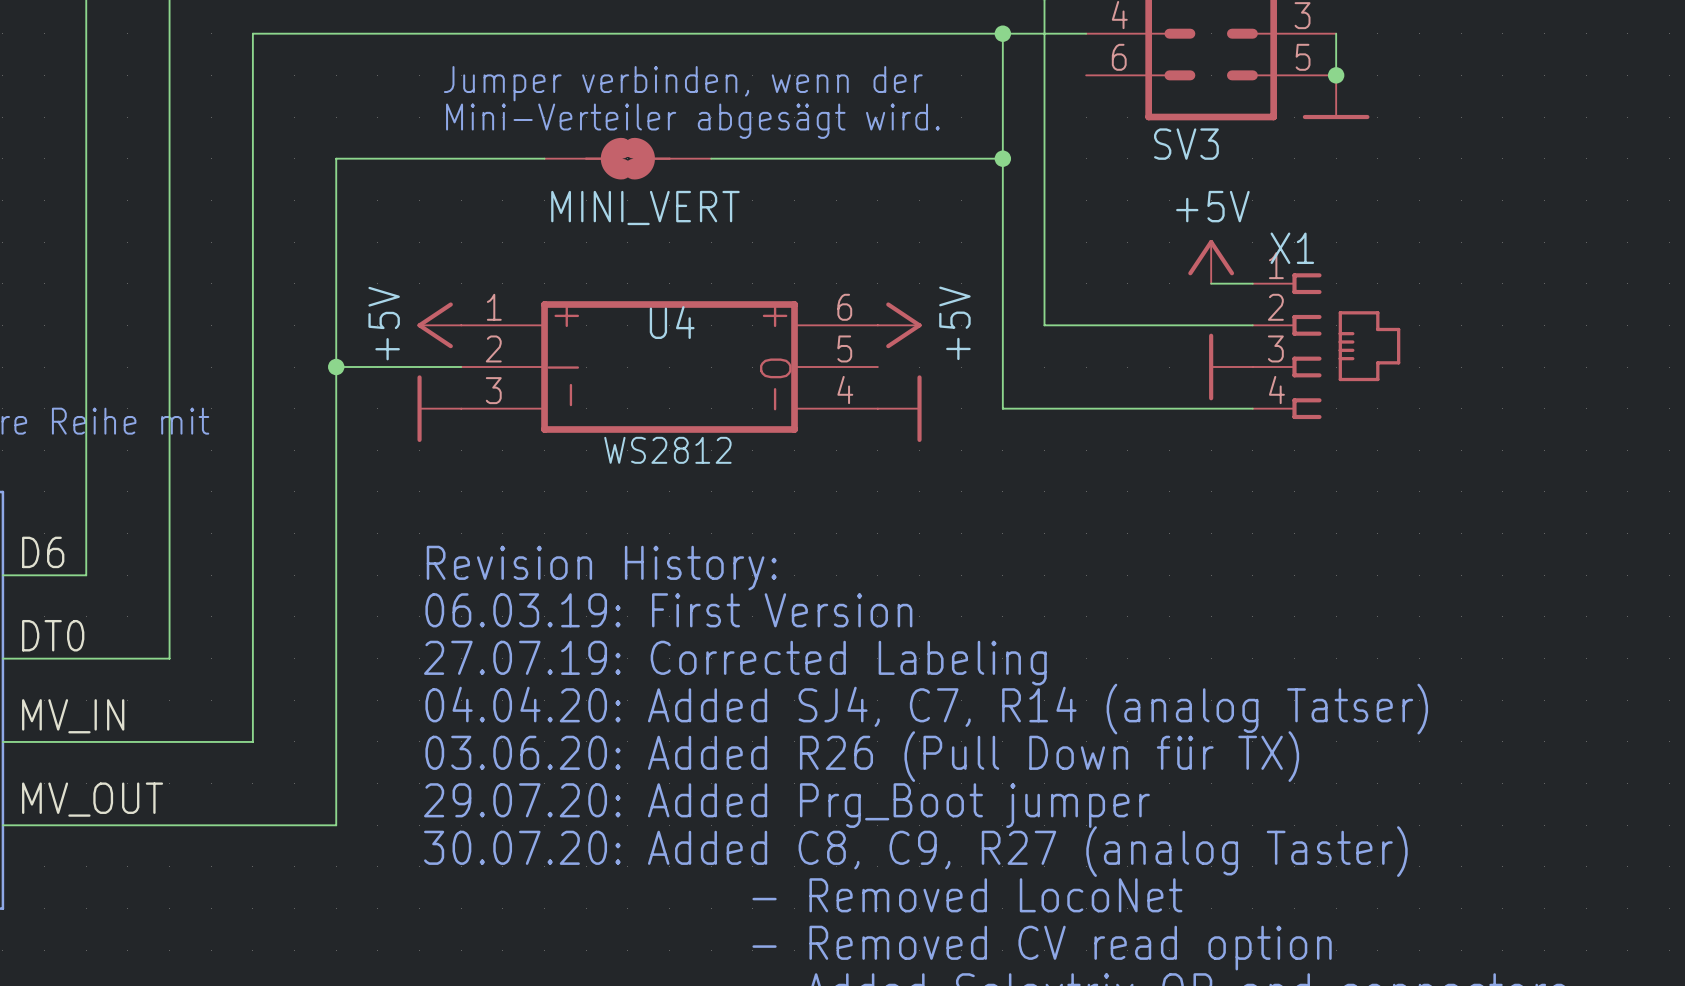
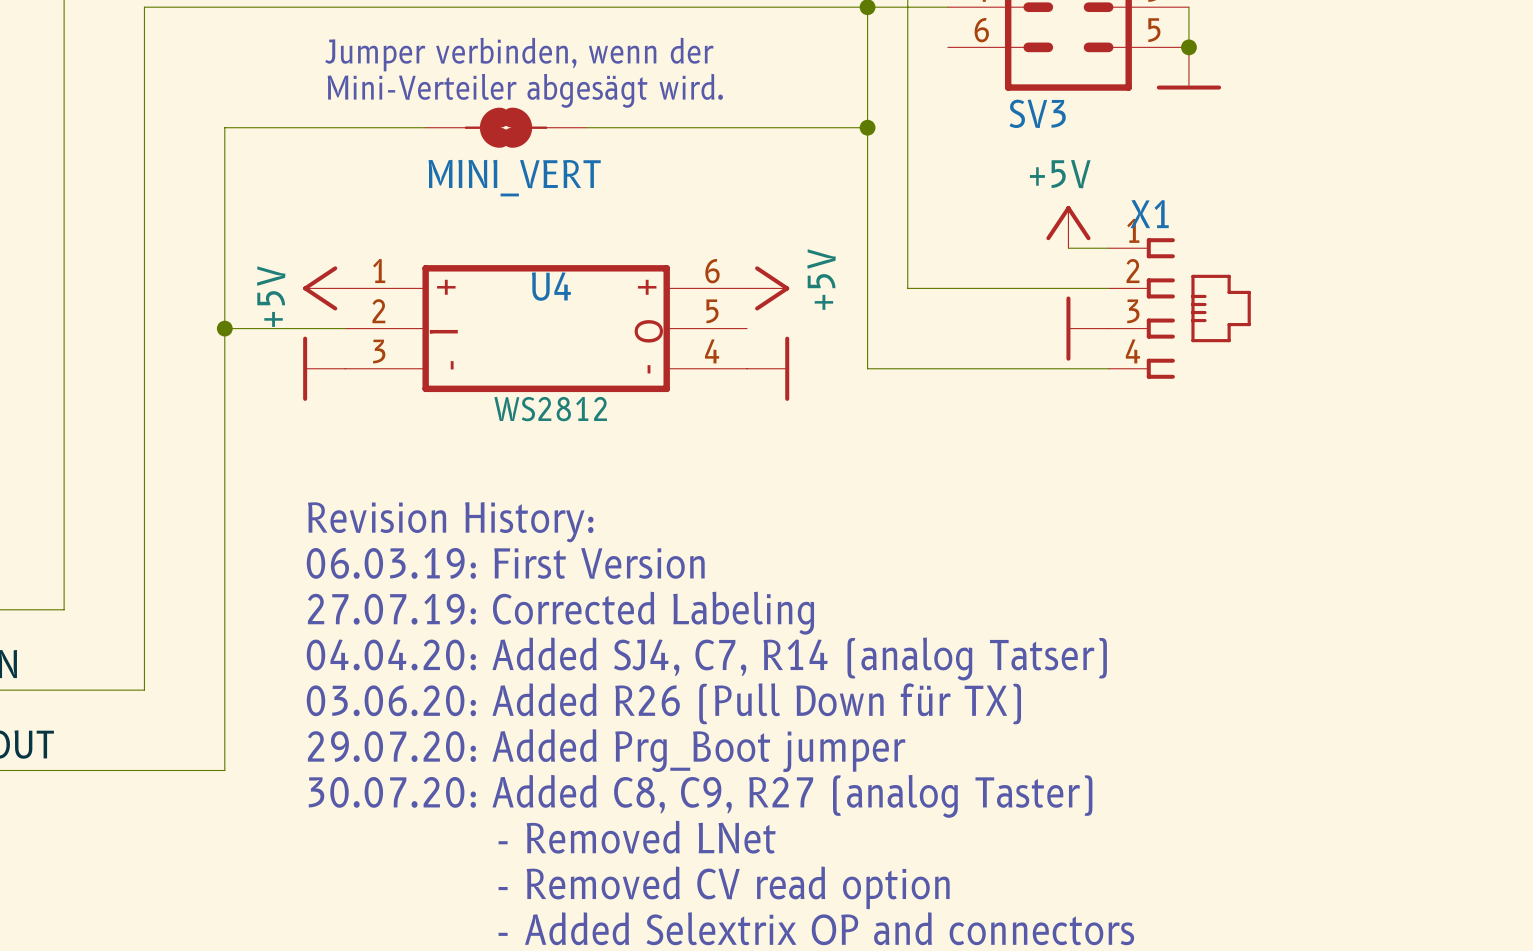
text: - Removed LocoNet (967, 895) -> - Removed LNet (637, 837)

